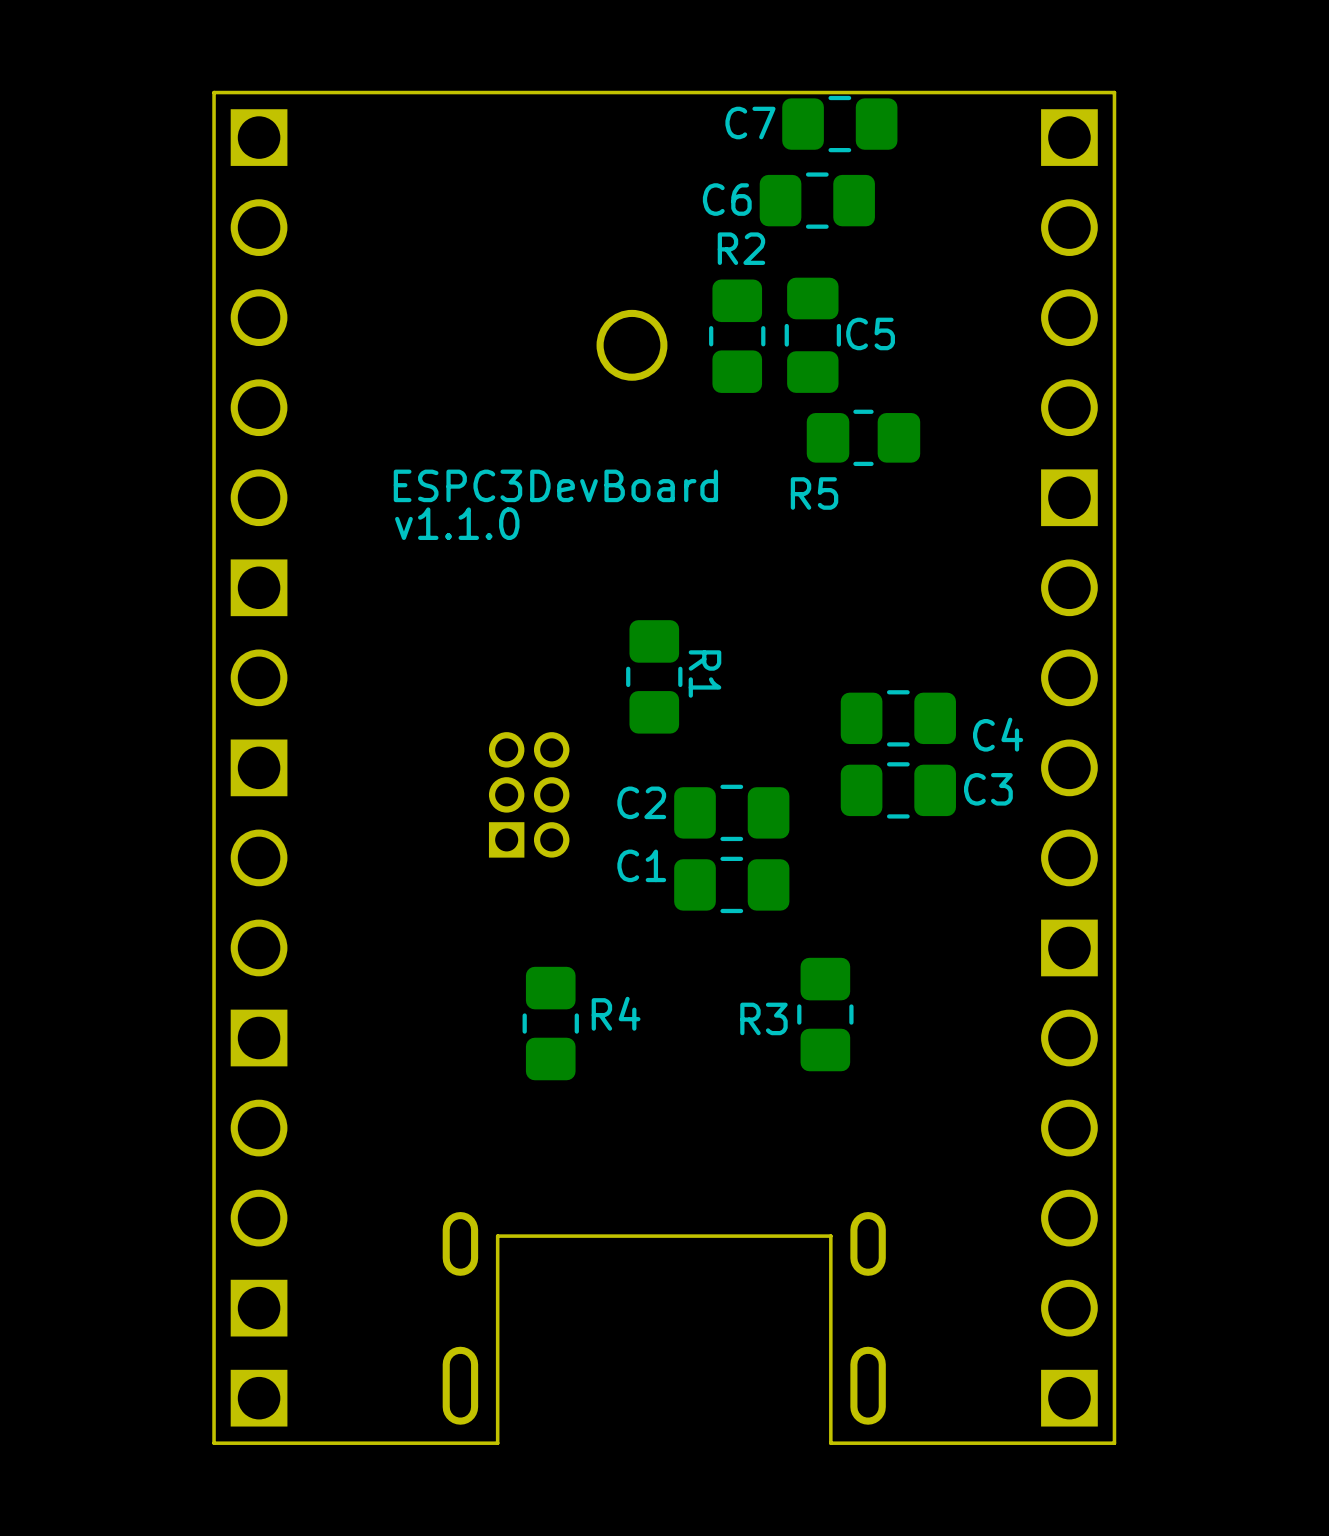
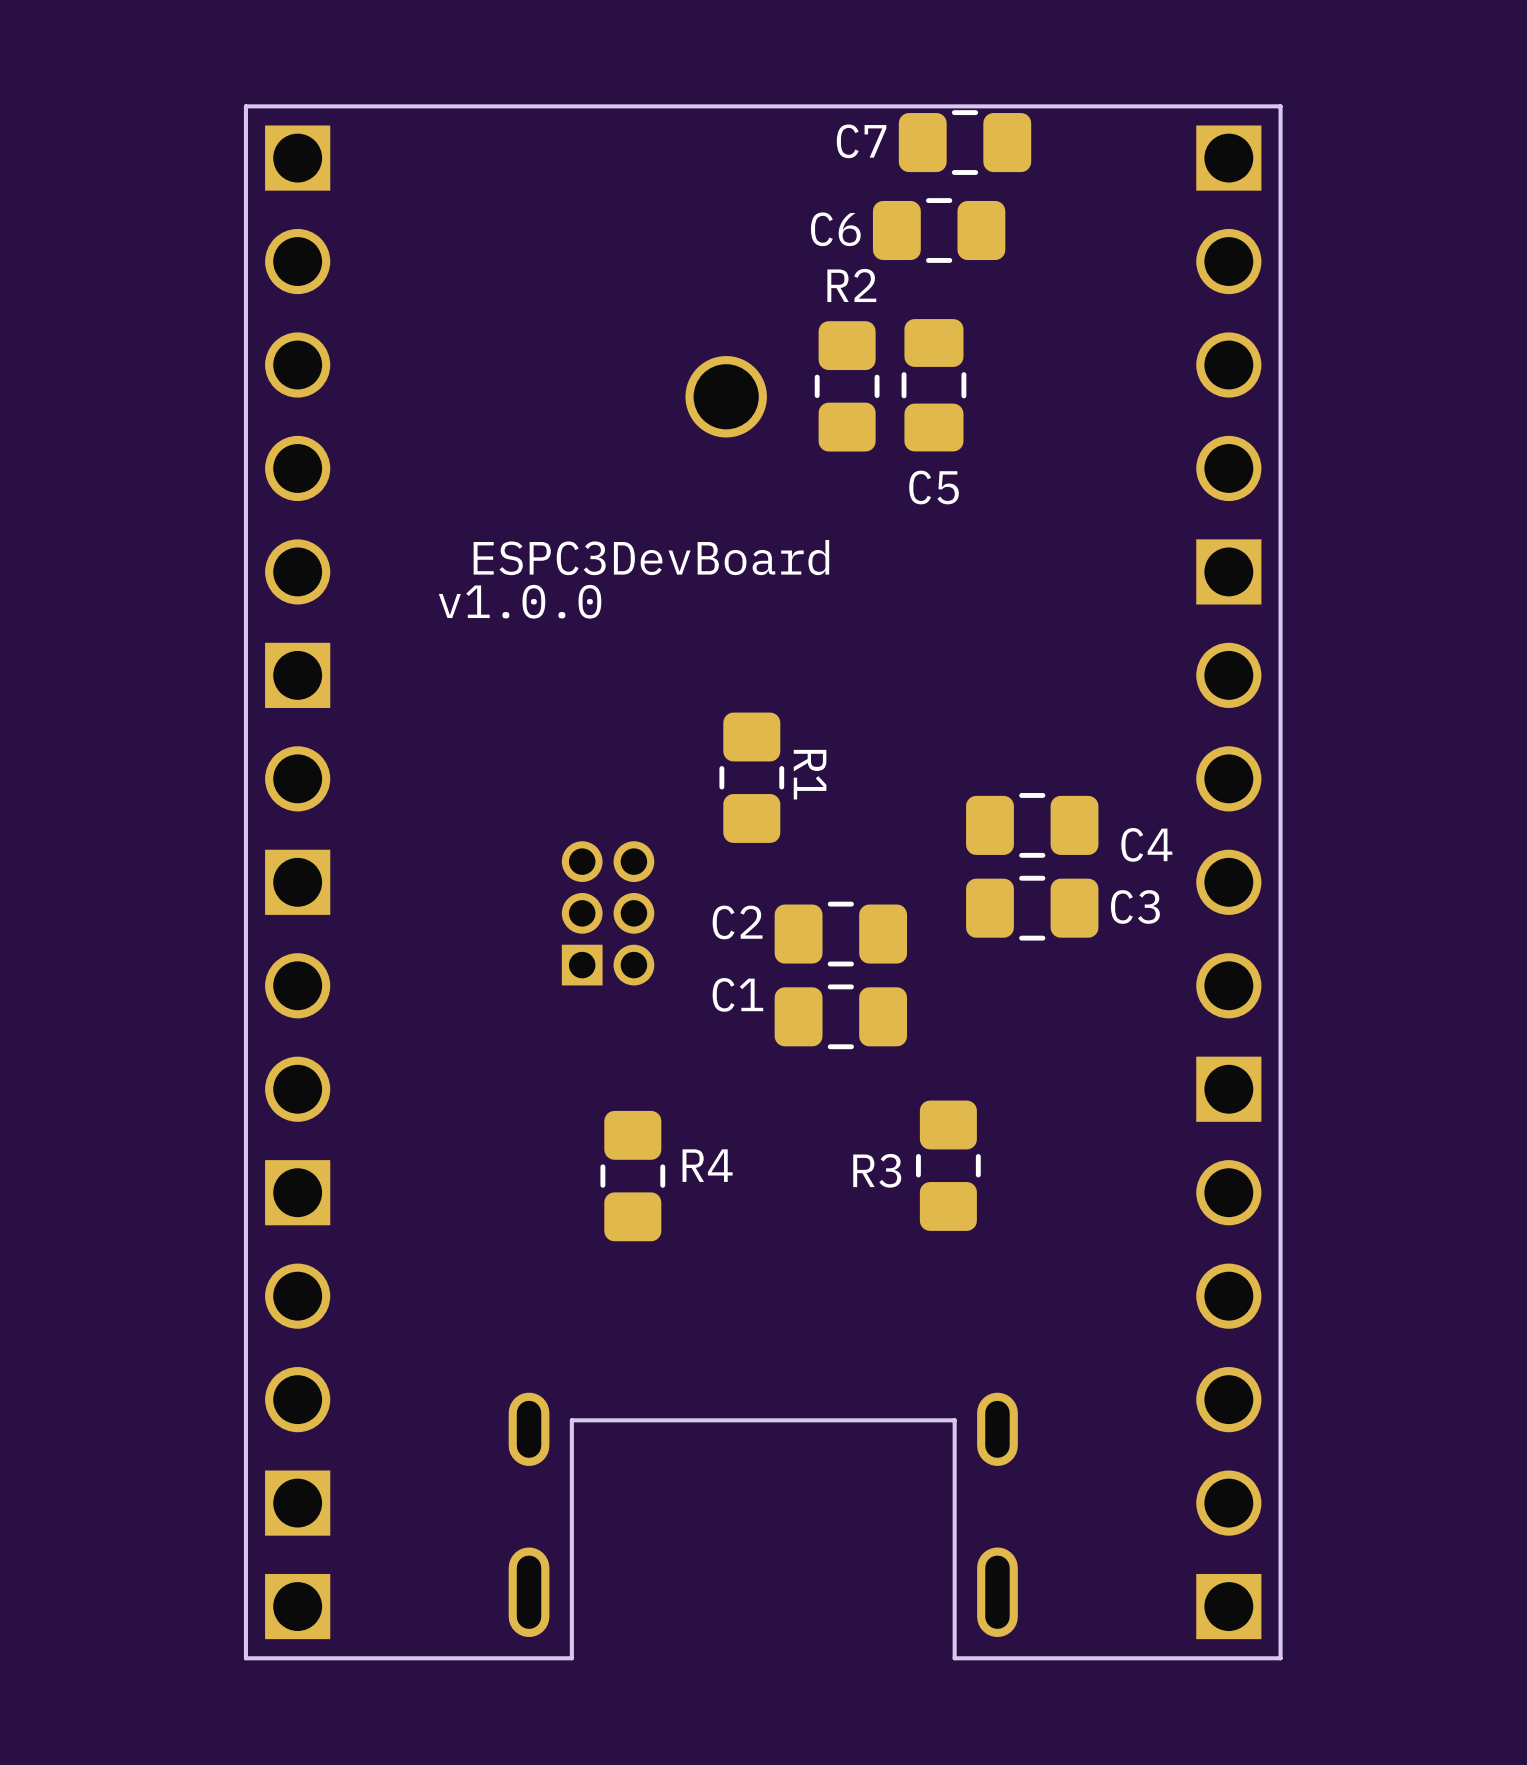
C5 name position: C5 (870, 333) -> C5 (934, 487)
R5: (863, 437) -> none
text: v1.1.0 (457, 523) -> v1.0.0 (520, 601)

